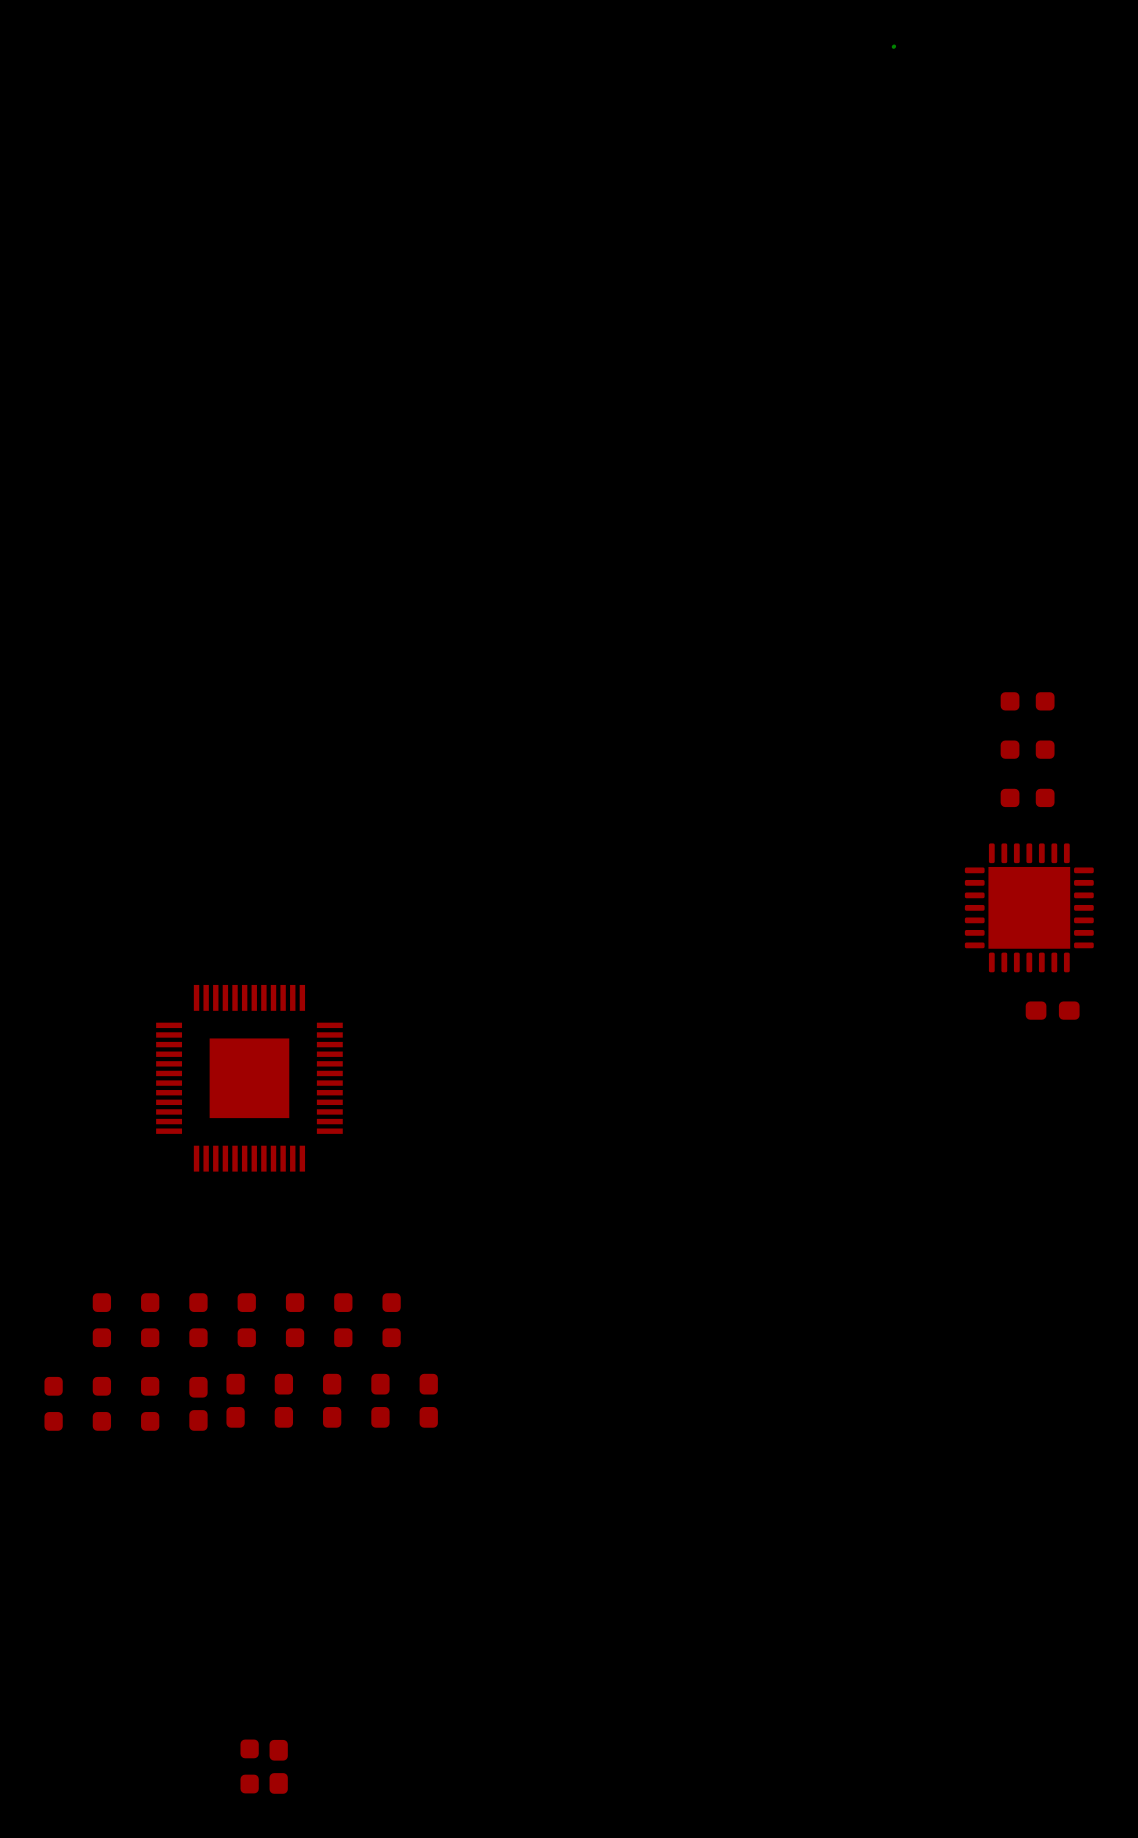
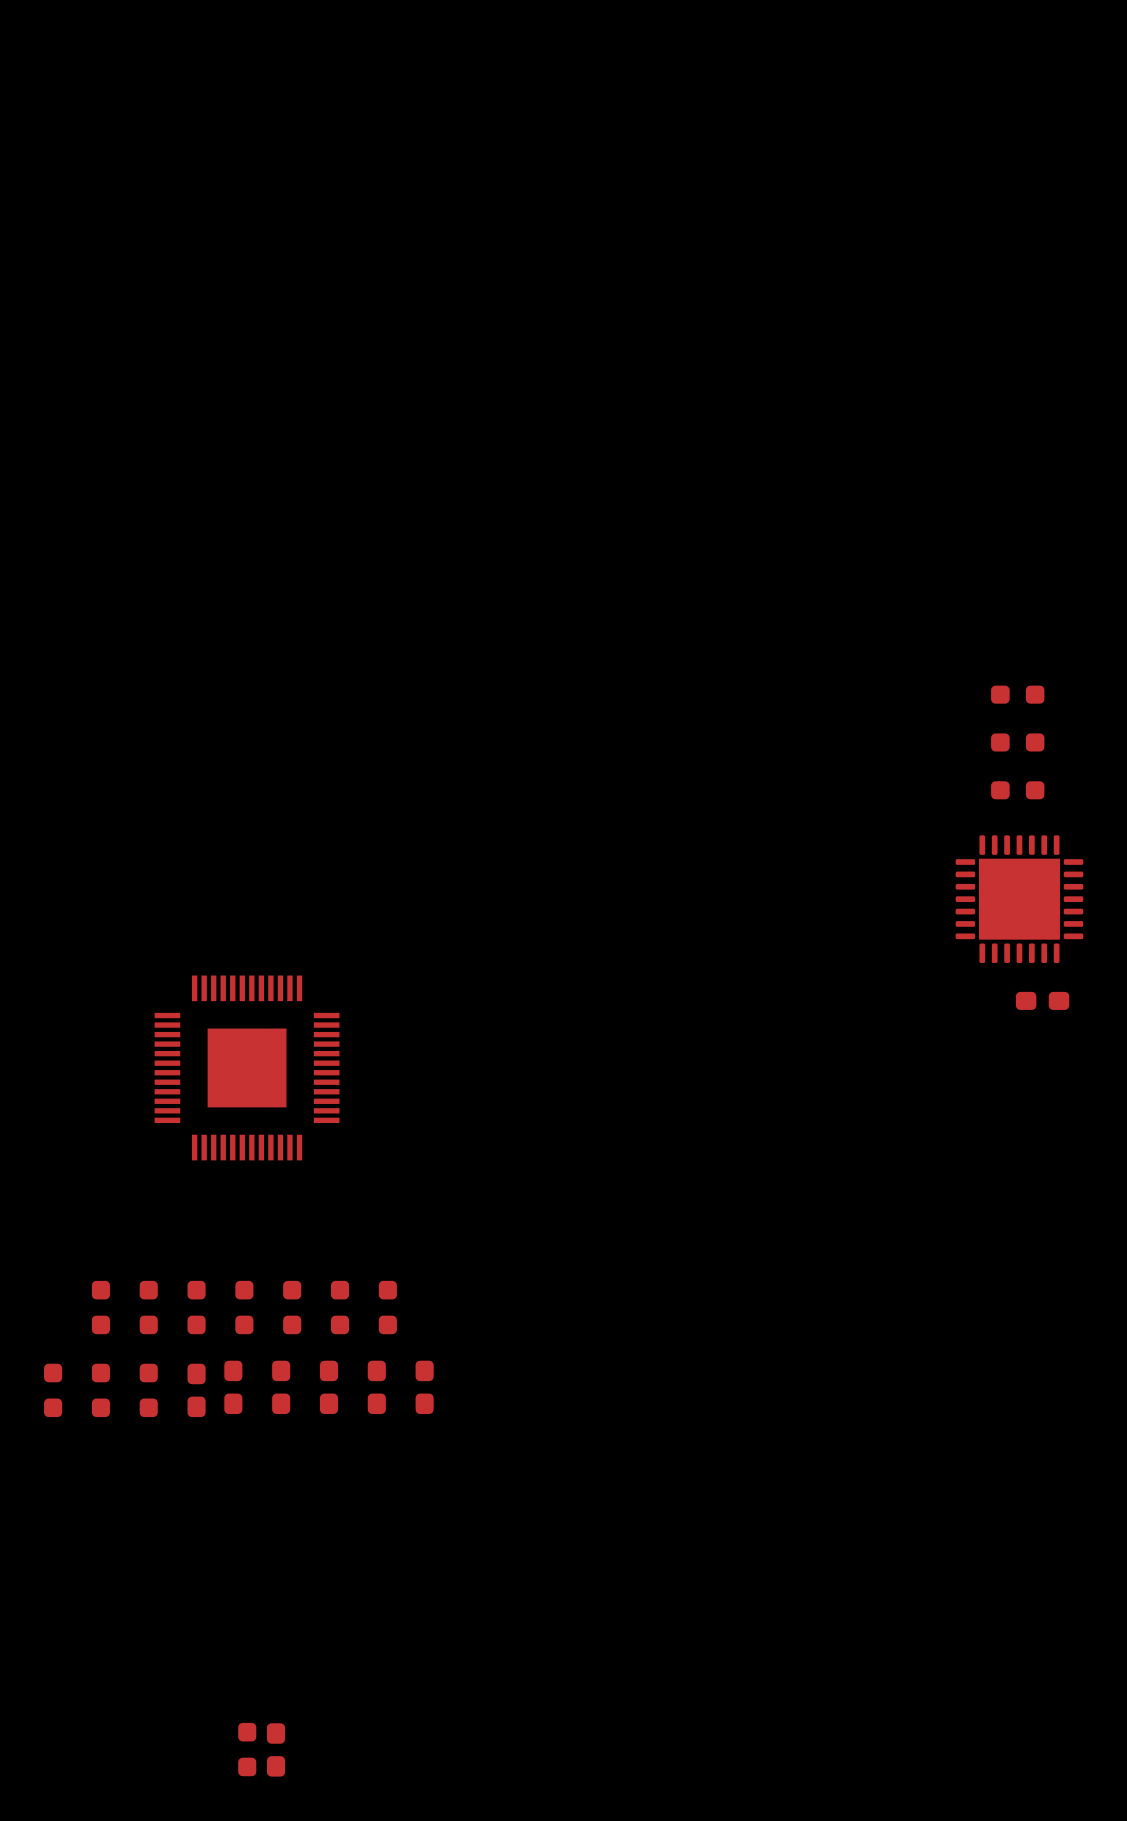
bottom track: (894, 46) (893, 46) -> none

